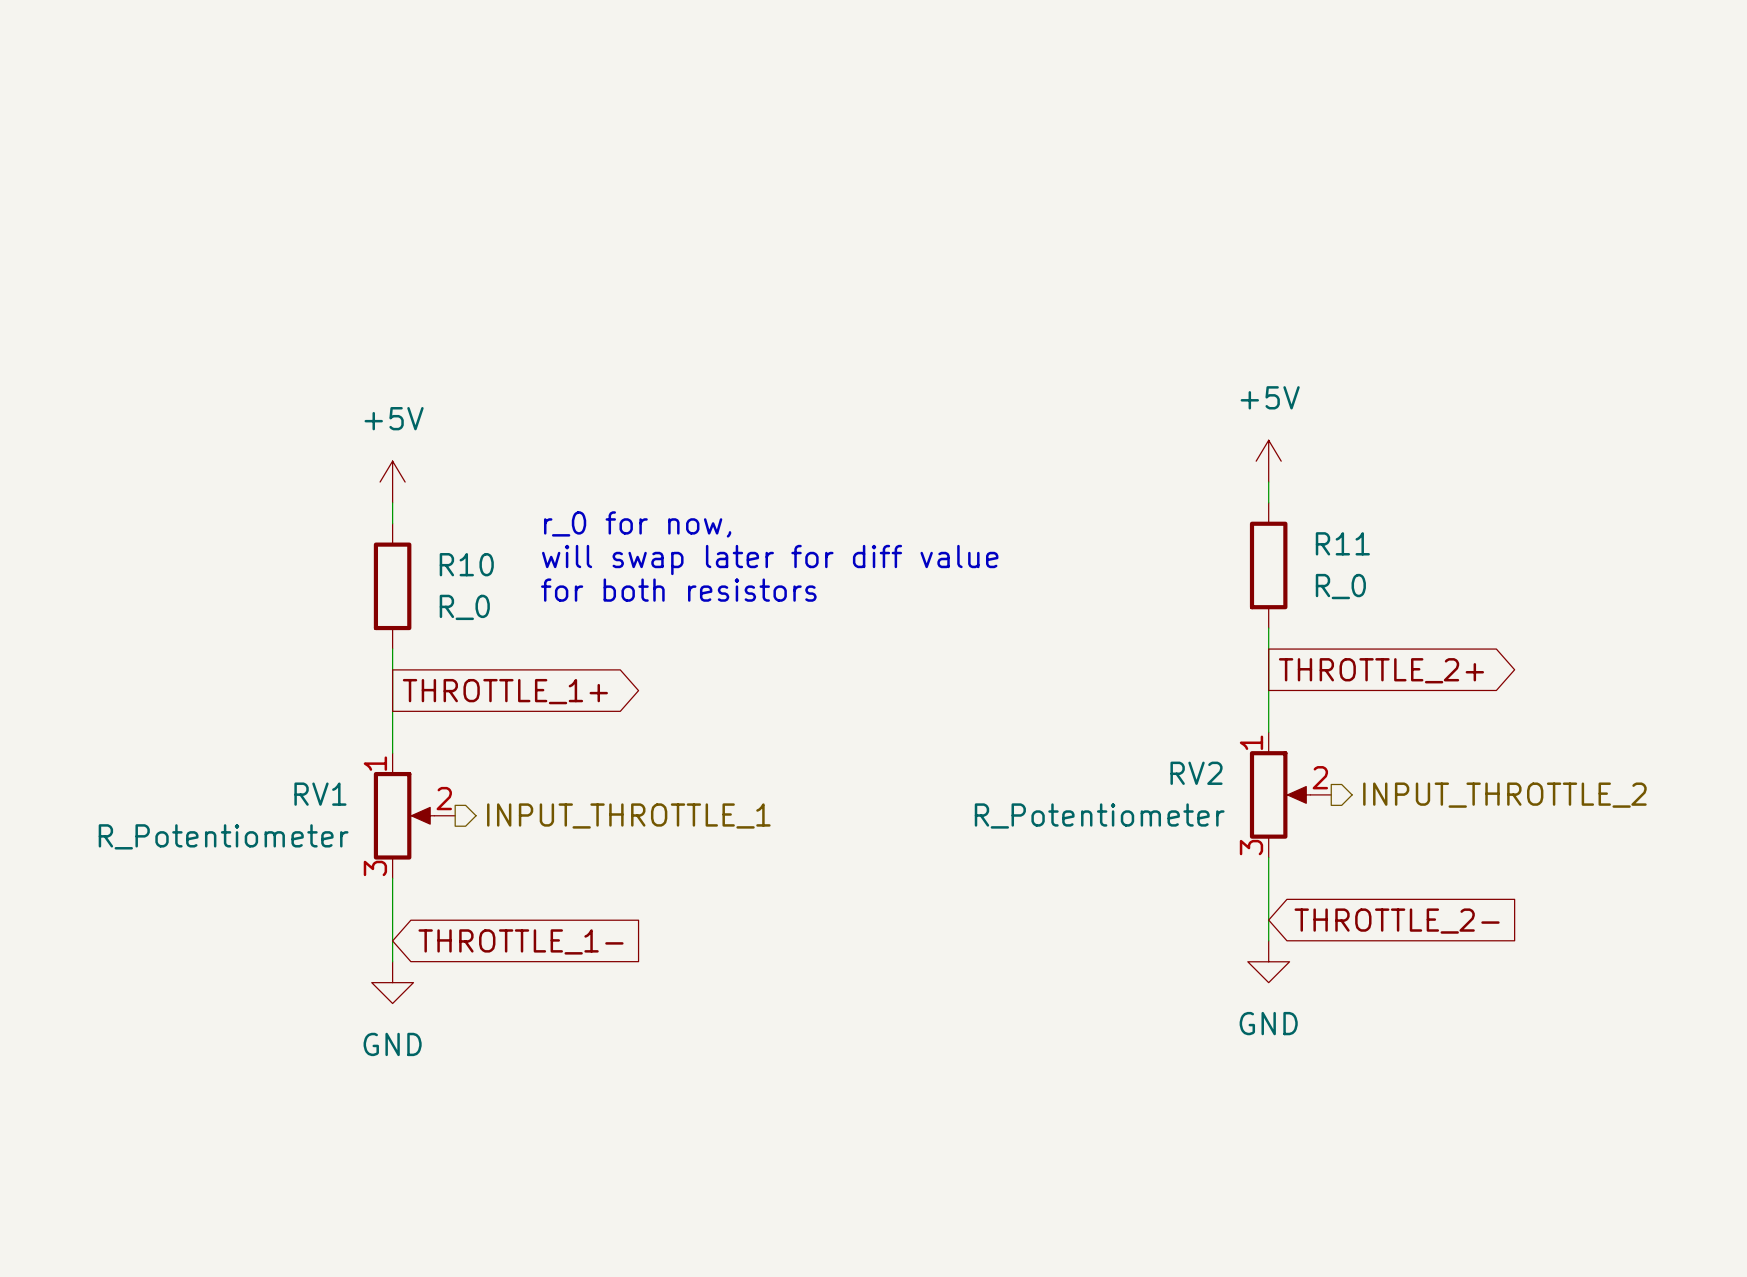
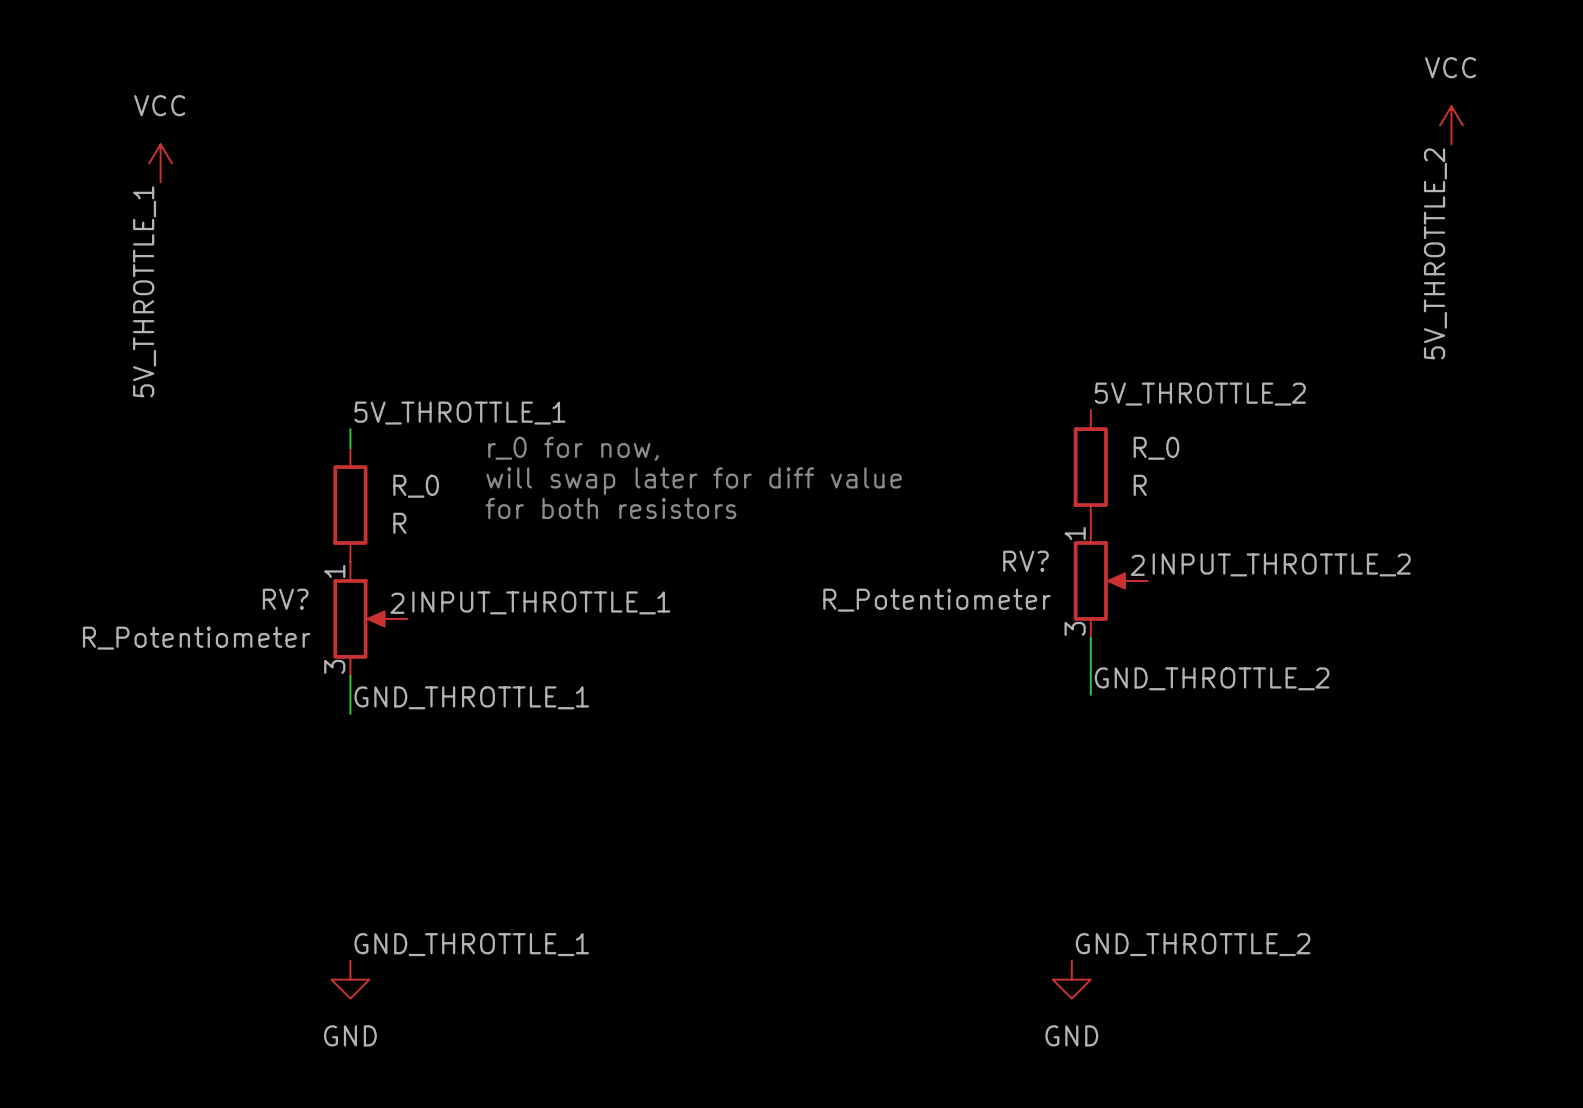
power symbol: none -> VCC (1451, 125)
power symbol: none -> VCC (160, 163)
label: none -> 5V_THROTTLE_2 (1435, 253)
label: none -> 5V_THROTTLE_1 (144, 291)
power symbol: +5V (1268, 461) -> none
label: none -> 5V_THROTTLE_2 (1200, 394)
power symbol: +5V (392, 482) -> none
wire: (1268, 482) (1268, 502) -> none
label: none -> 5V_THROTTLE_1 (459, 413)
R_0: none -> R (1090, 467)
R10 name: R10 (466, 564) -> R_0 (416, 486)
R11: R_0 (1268, 565) -> none
R10 value: R_0 (464, 607) -> R (399, 523)
wire: (1268, 628) (1268, 732) -> none
wire: (392, 648) (392, 753) -> none
label: none -> INPUT_THROTTLE_2 (1281, 564)
RV?: none -> R_Potentiometer (1110, 580)
global label: THROTTLE_2+ (1381, 670) -> none
global label: THROTTLE_1+ (505, 691) -> none
label: none -> INPUT_THROTTLE_1 (541, 602)
RV?: none -> R_Potentiometer (370, 618)
wire: none -> (1090, 637) (1090, 694)
wire: none -> (350, 675) (350, 713)
label: none -> GND_THROTTLE_2 (1212, 678)
RV2: R_Potentiometer (1290, 794) -> none
hierarchical label: INPUT_THROTTLE_2 (1504, 795) -> none
label: none -> GND_THROTTLE_1 (471, 697)
RV1: R_Potentiometer (414, 815) -> none
hierarchical label: INPUT_THROTTLE_1 (628, 815) -> none
wire: (1268, 857) (1268, 940) -> none
wire: (392, 878) (392, 961) -> none
global label: THROTTLE_2- (1397, 921) -> none
global label: THROTTLE_1- (521, 941) -> none
power symbol position: GND (1268, 961) -> GND (1071, 979)
power symbol position: GND (392, 982) -> GND (350, 979)
label: none -> GND_THROTTLE_1 (471, 944)
label: none -> GND_THROTTLE_2 (1193, 944)

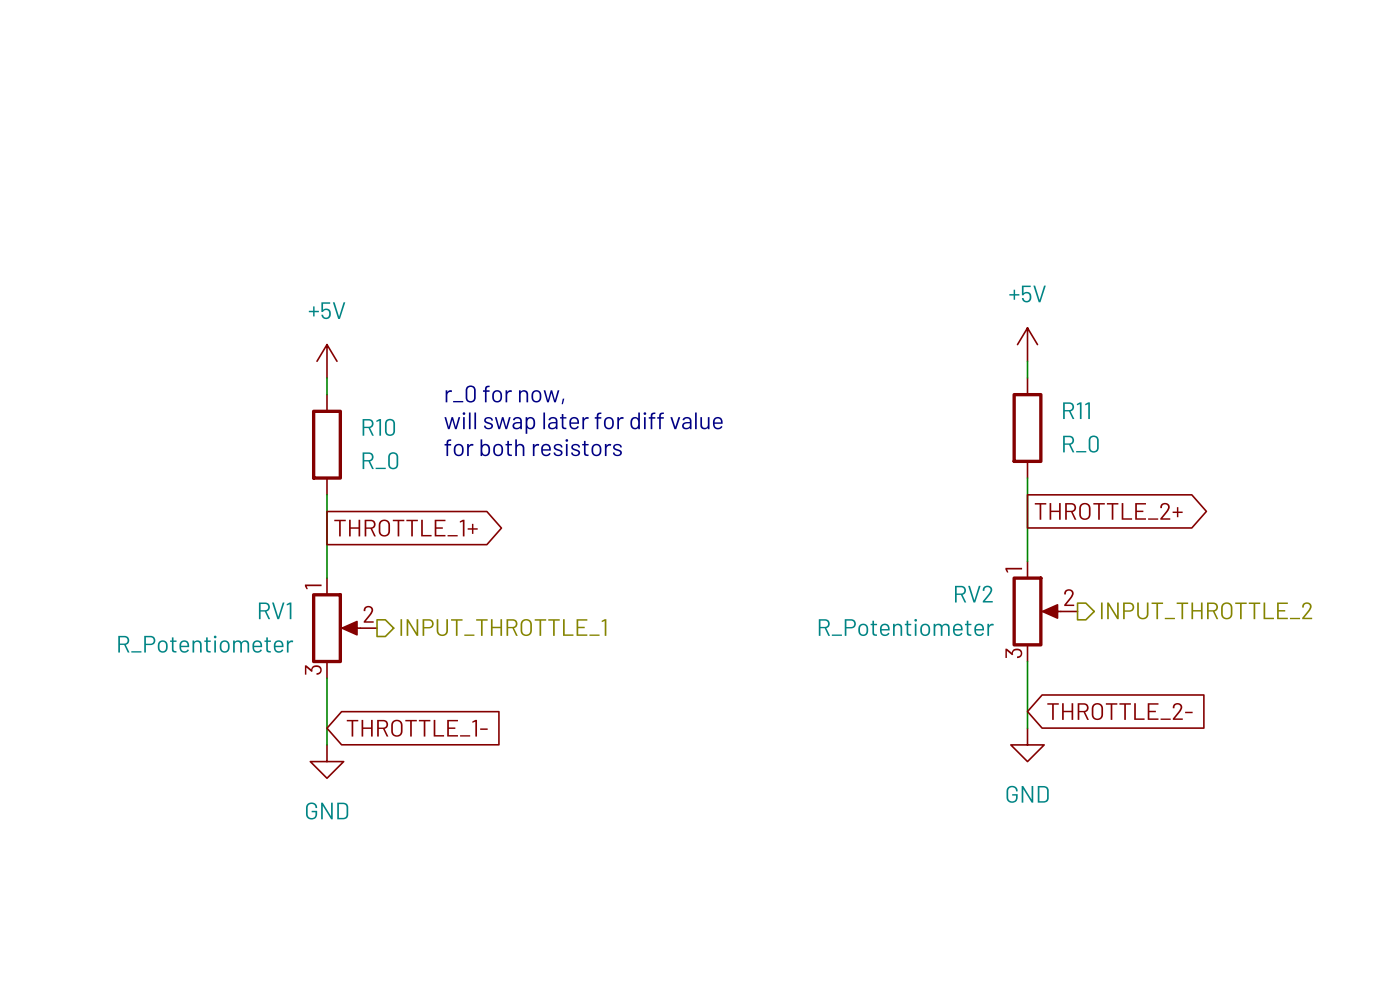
power symbol: VCC (1451, 125) -> none
power symbol: VCC (160, 163) -> none
label: 5V_THROTTLE_2 (1435, 253) -> none
label: 5V_THROTTLE_1 (144, 291) -> none
power symbol: none -> +5V (1027, 344)
label: 5V_THROTTLE_2 (1200, 394) -> none
power symbol: none -> +5V (326, 361)
wire: none -> (1027, 361) (1027, 377)
label: 5V_THROTTLE_1 (459, 413) -> none
R_0: R (1090, 467) -> none
R_0 name: R_0 (416, 486) -> R10 (378, 427)
R11: none -> R_0 (1027, 428)
R_0 value: R (399, 523) -> R_0 (380, 460)
wire: none -> (1027, 478) (1027, 561)
wire: none -> (326, 494) (326, 578)
label: INPUT_THROTTLE_2 (1281, 564) -> none
RV?: R_Potentiometer (1110, 580) -> none
global label: none -> THROTTLE_2+ (1108, 511)
global label: none -> THROTTLE_1+ (405, 528)
label: INPUT_THROTTLE_1 (541, 602) -> none
RV?: R_Potentiometer (370, 618) -> none
wire: (1090, 637) (1090, 694) -> none
wire: (350, 675) (350, 713) -> none
label: GND_THROTTLE_2 (1212, 678) -> none
RV2: none -> R_Potentiometer (1045, 611)
hierarchical label: none -> INPUT_THROTTLE_2 (1206, 610)
label: GND_THROTTLE_1 (471, 697) -> none
RV1: none -> R_Potentiometer (344, 628)
hierarchical label: none -> INPUT_THROTTLE_1 (503, 627)
wire: none -> (1027, 661) (1027, 728)
wire: none -> (326, 678) (326, 744)
global label: none -> THROTTLE_2- (1119, 711)
global label: none -> THROTTLE_1- (417, 728)
label: GND_THROTTLE_1 (471, 944) -> none
label: GND_THROTTLE_2 (1193, 944) -> none
power symbol position: GND (350, 979) -> GND (326, 761)
power symbol position: GND (1071, 979) -> GND (1027, 744)

